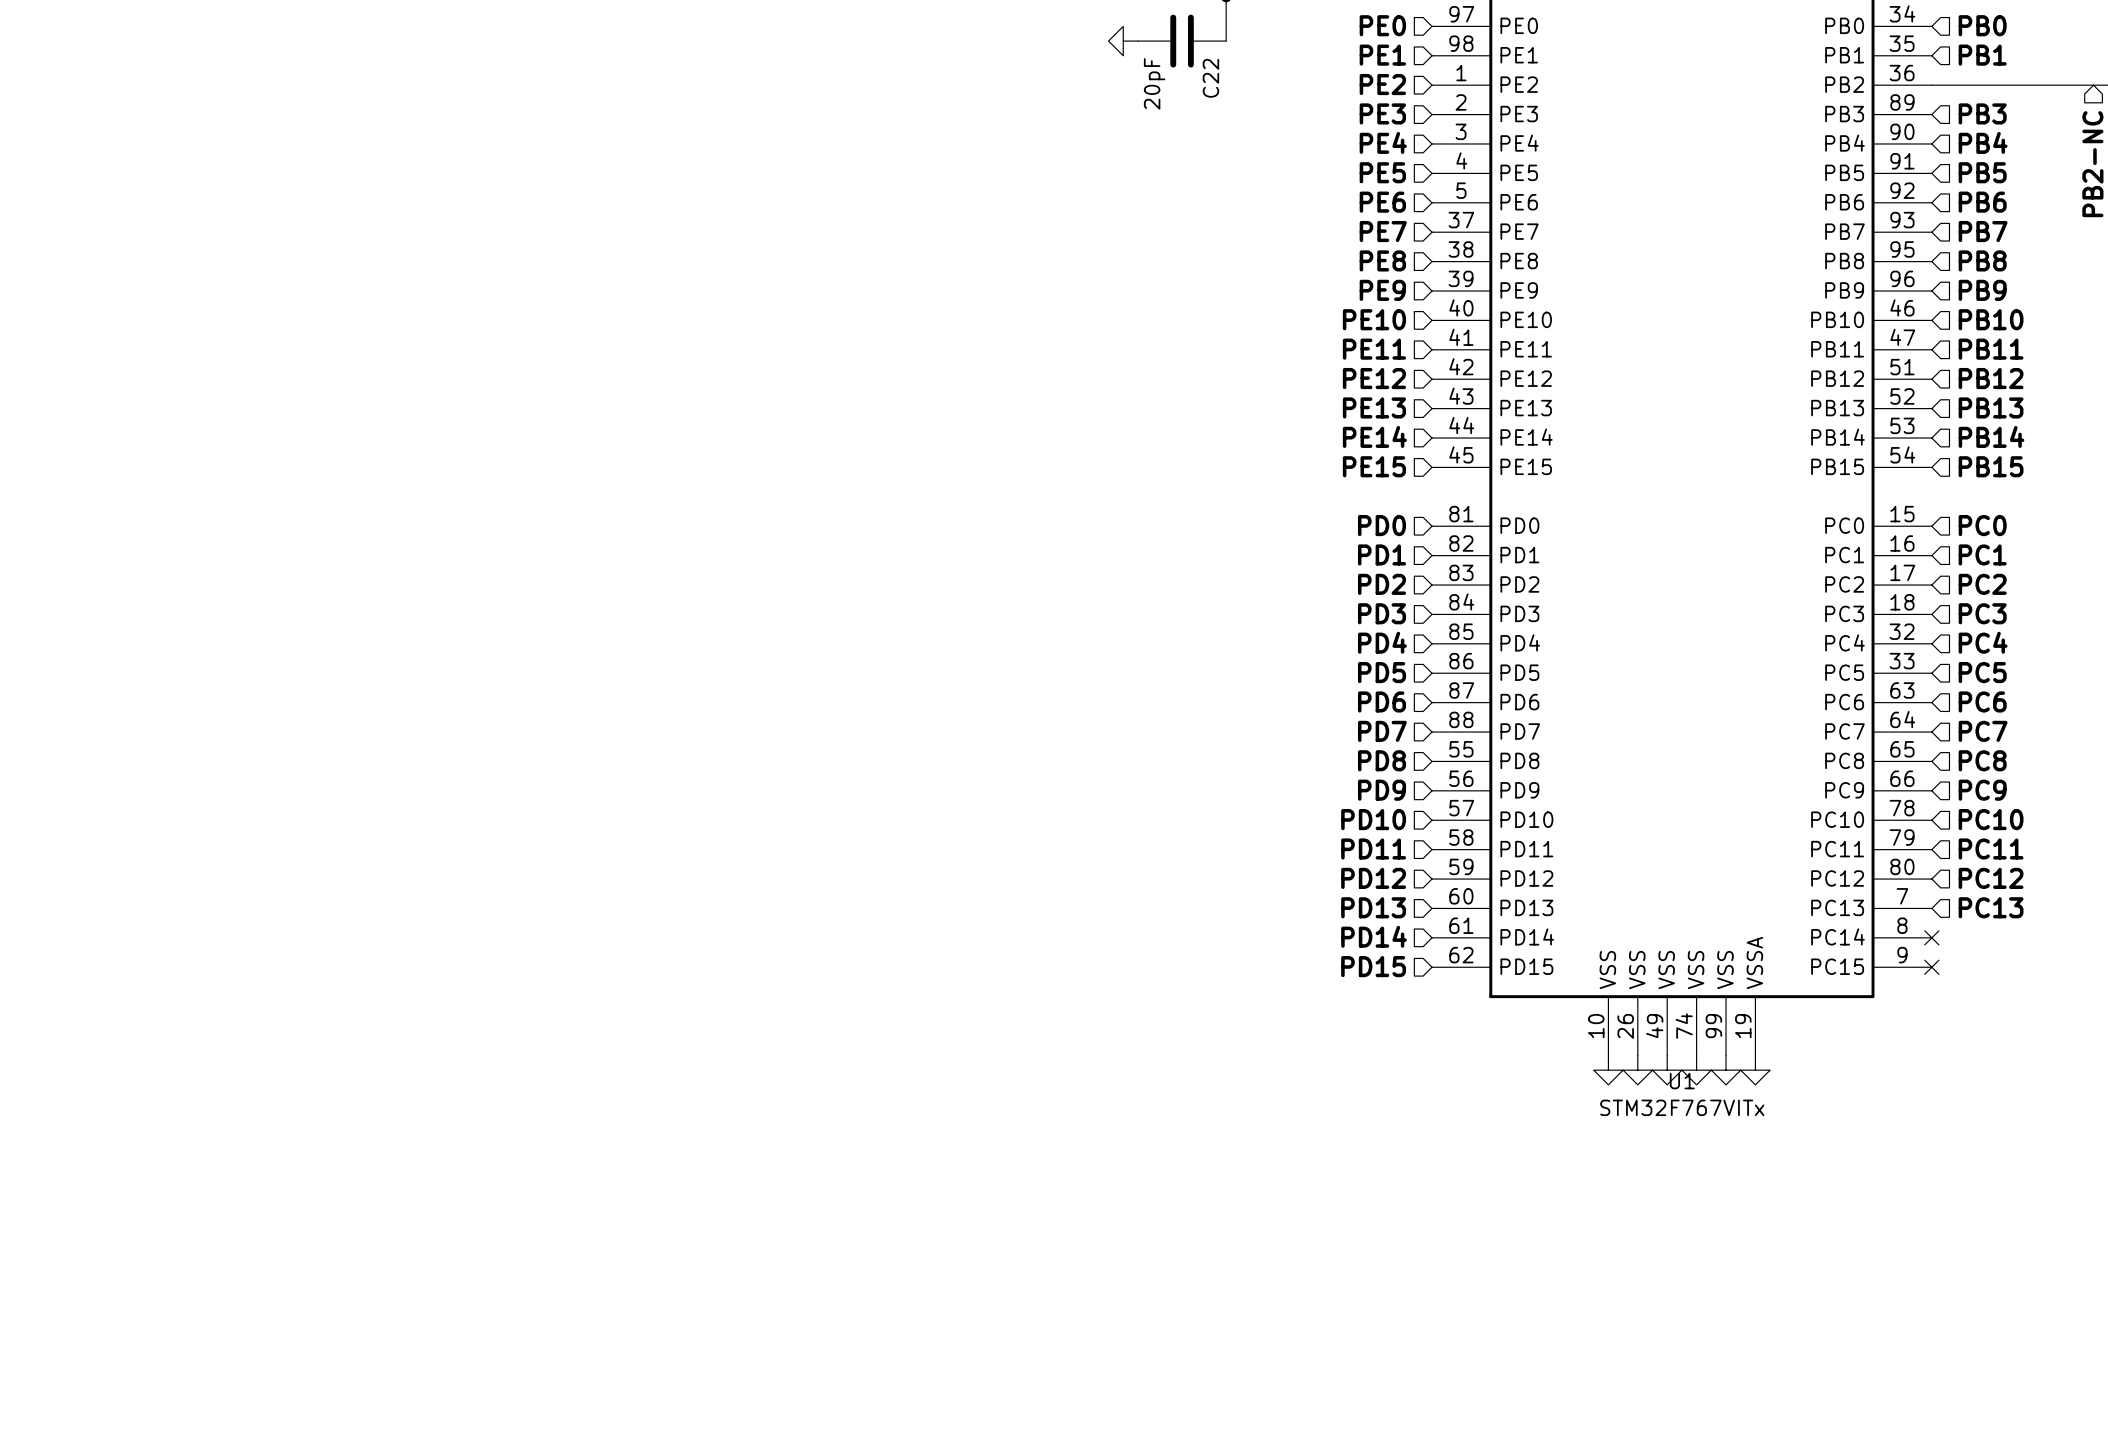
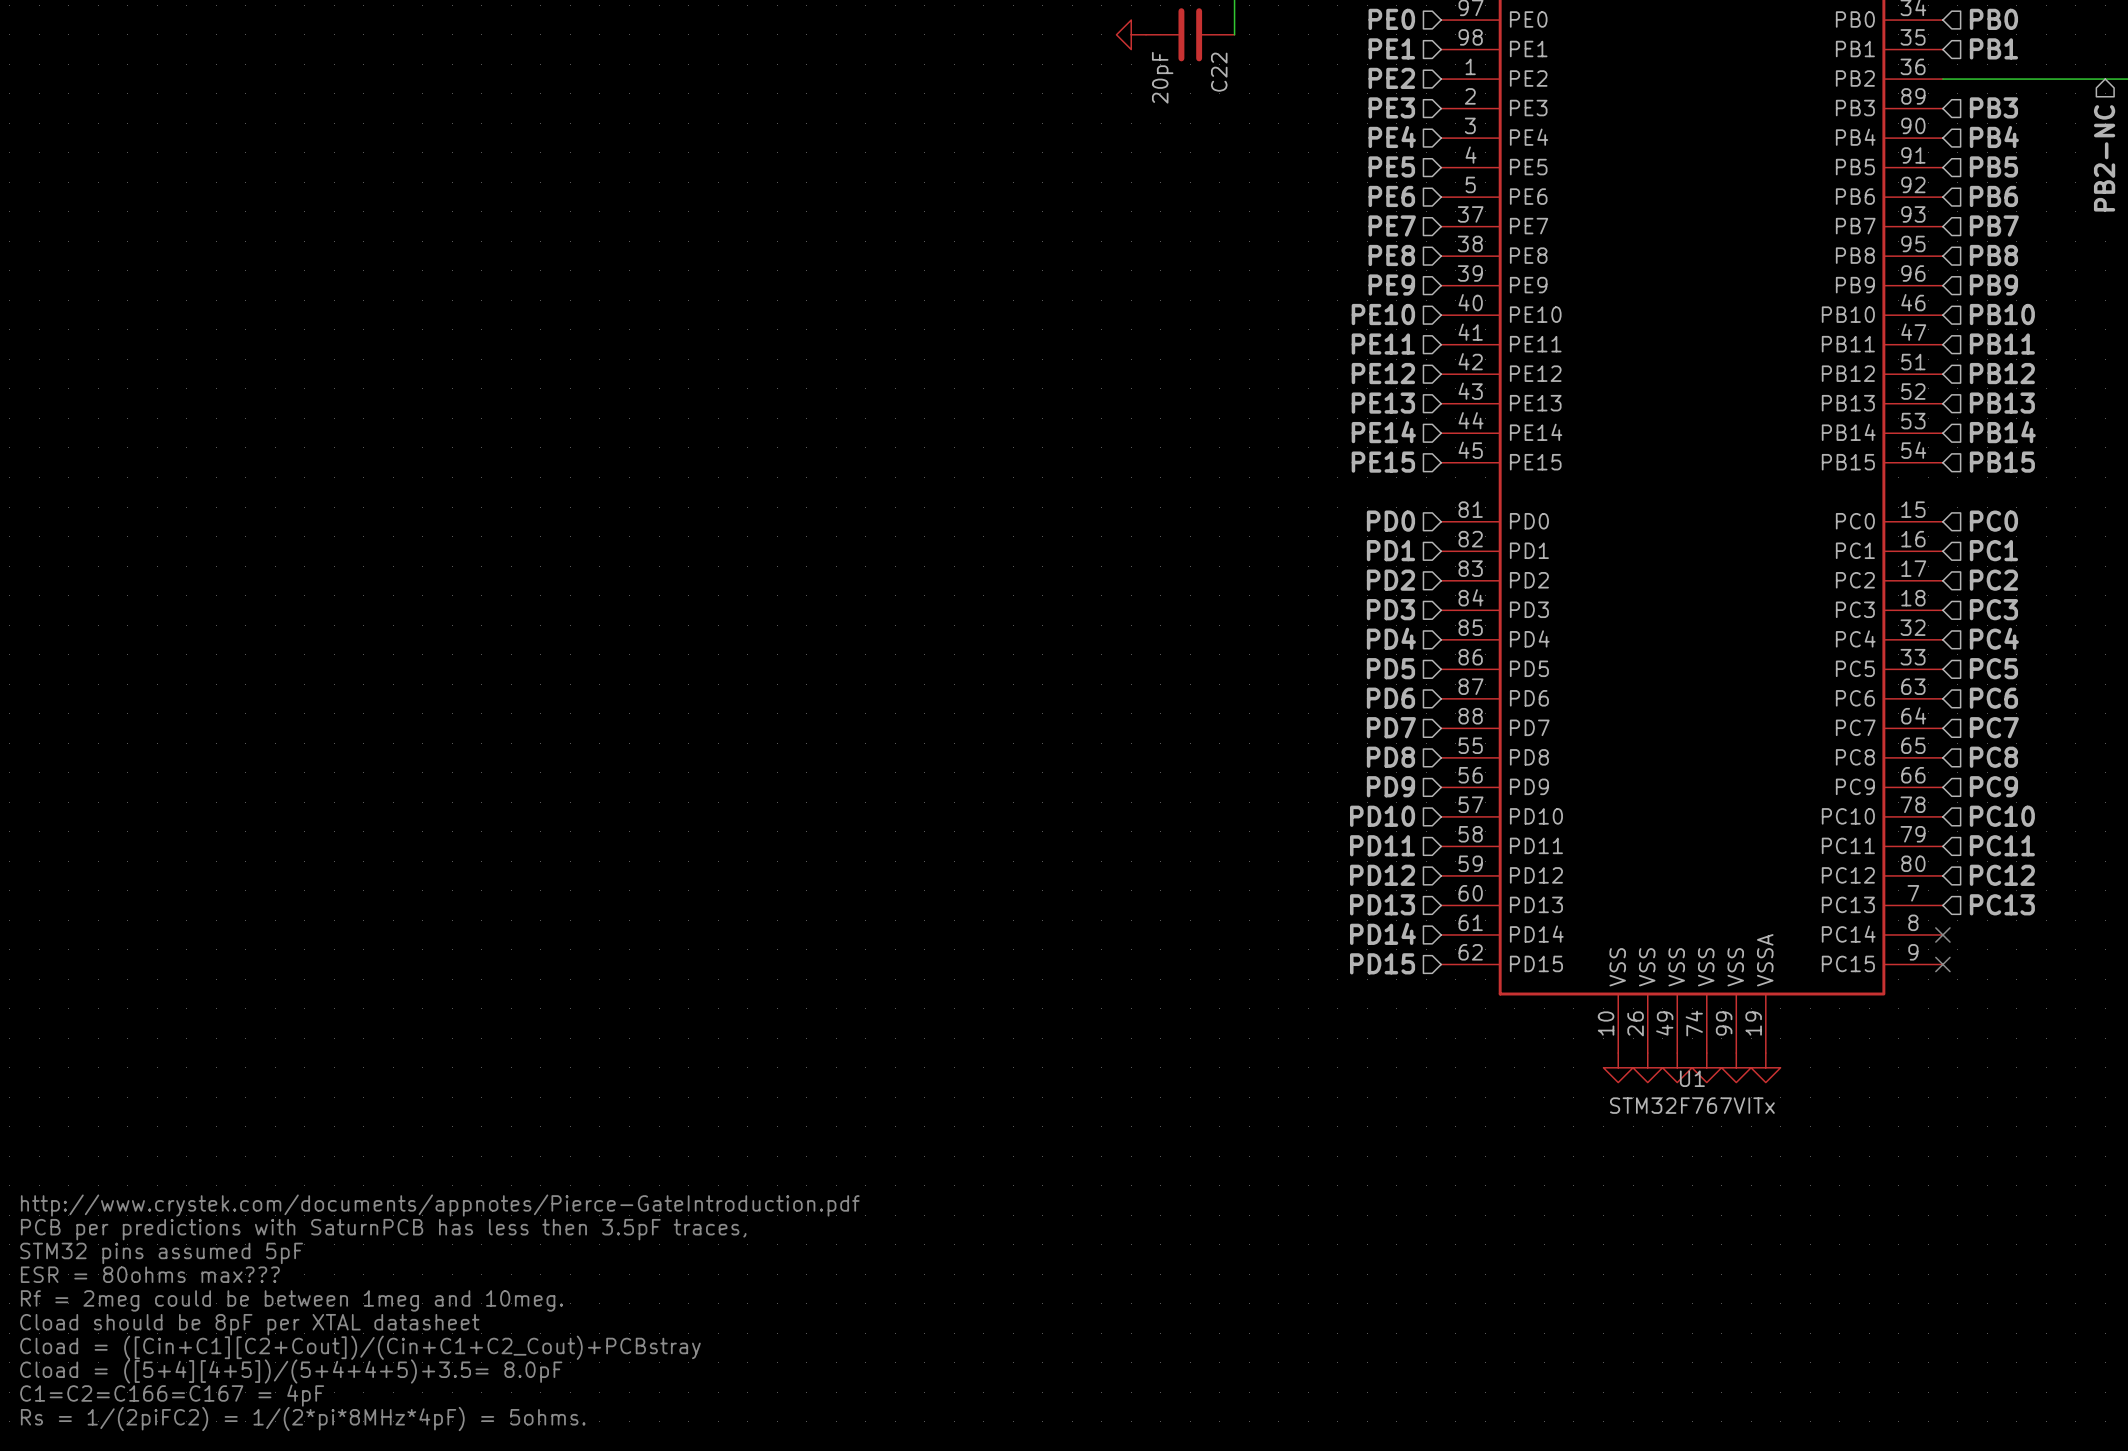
text: none -> http://www.crystek.com/documents/appnotes/Pierce-GateIntroduction.pdf (440, 1205)
text: none -> PCB per predictions with SaturnPCB has less then 3.5pF traces, (383, 1229)
text: none -> STM32 pins assumed 5pF (161, 1253)
text: none -> ESR = 80ohms max??? (150, 1274)
text: none -> Rf = 2meg could be between 1meg and 10meg. (291, 1300)
text: none -> Cload should be 8pF per XTAL datasheet (249, 1324)
text: none -> Cload = ([Cin+C1][C2+Cout])/(Cin+C1+C2_Cout)+PCBstray (360, 1347)
text: none -> Cload = ([5+4][4+5])/(5+4+4+5)+3.5= 8.0pF (291, 1371)
text: none -> C1=C2=C166=C167 = 4pF (172, 1395)
text: none -> Rs = 1/(2piFC2) = 1/(2*pi*8MHz*4pF) = 5ohms. (303, 1419)

